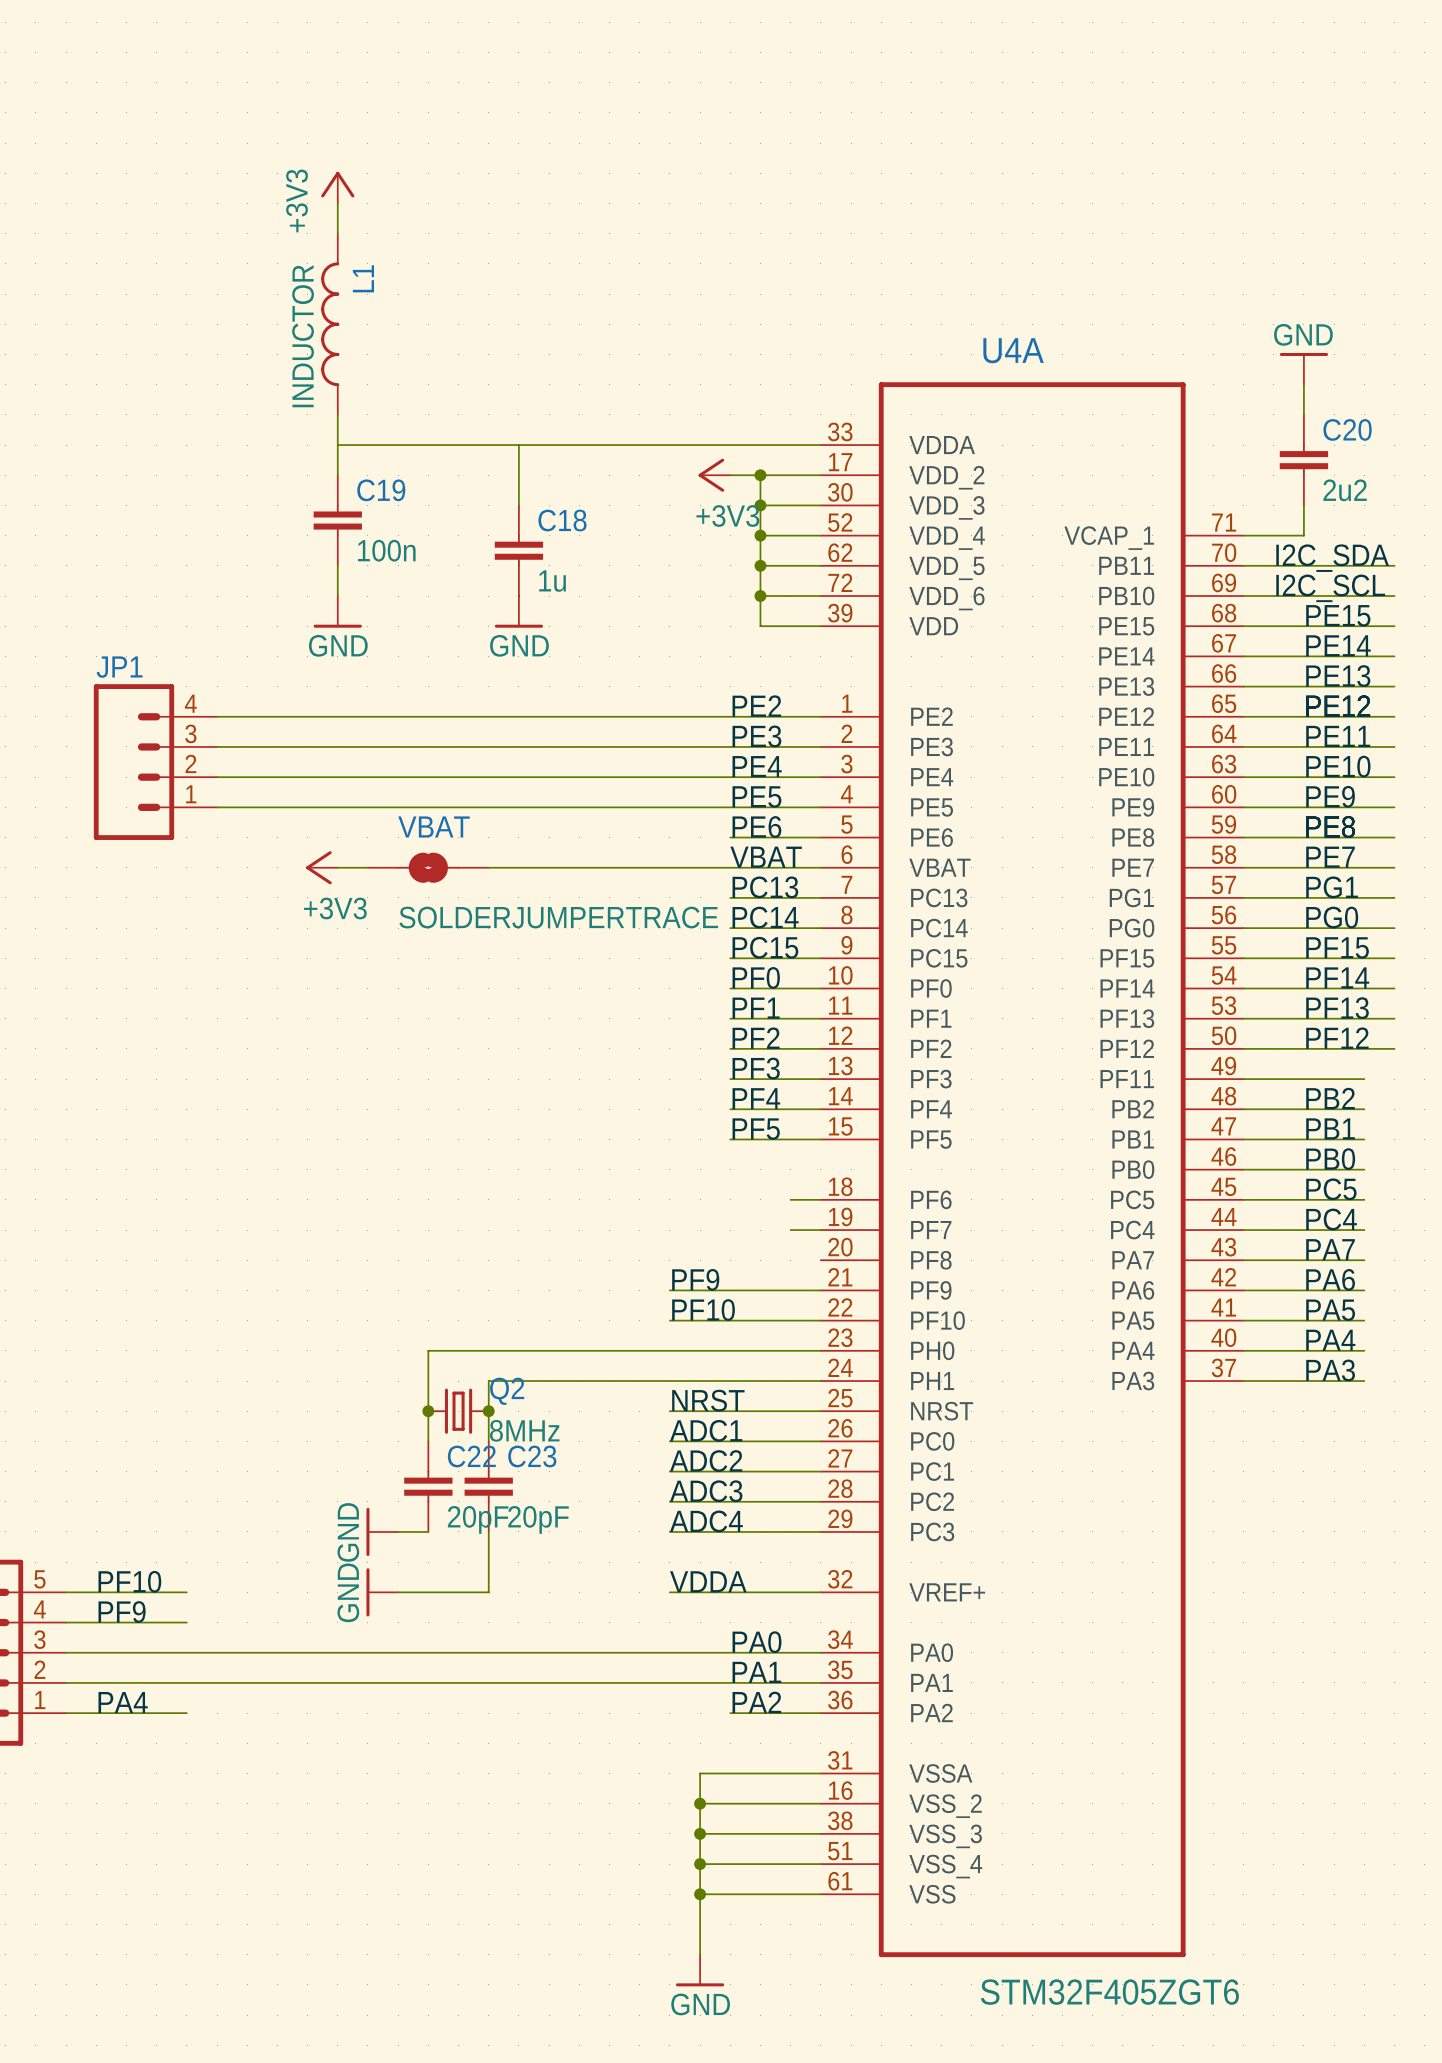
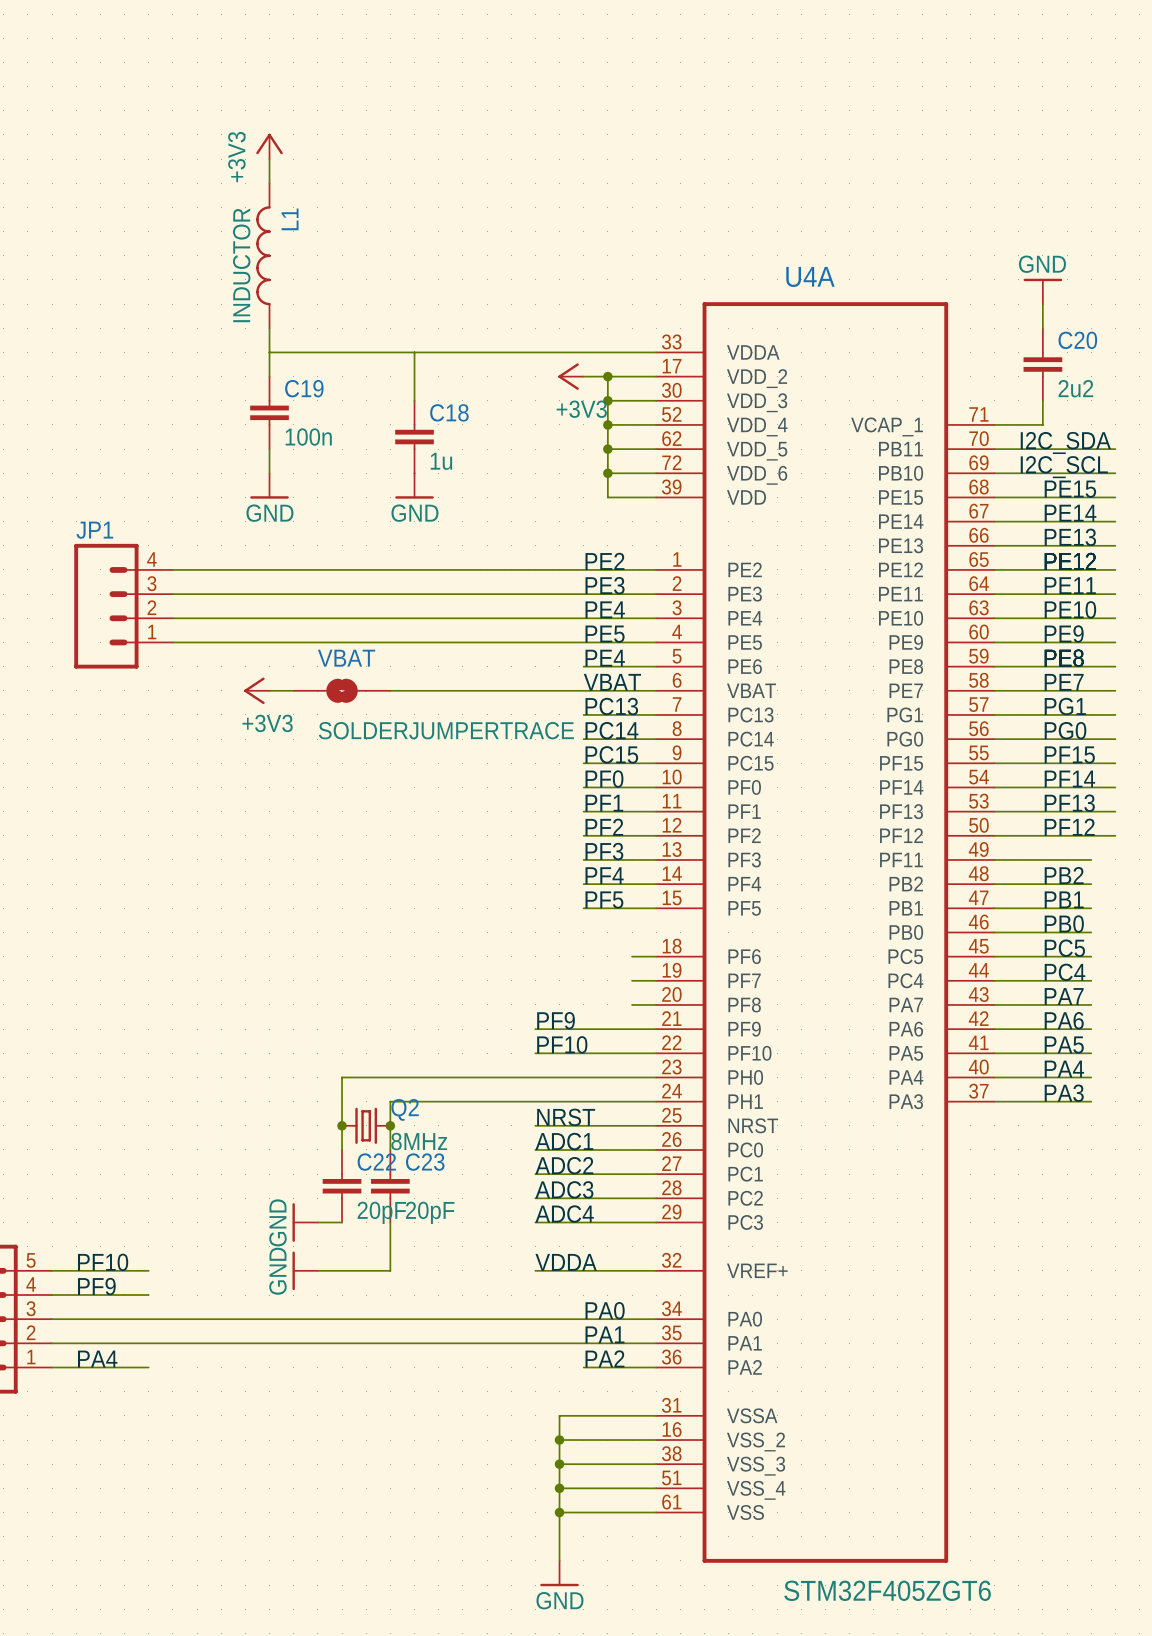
label: PE6 (756, 826) -> PE4 (605, 658)
wire: none -> (632, 1004) (656, 1004)

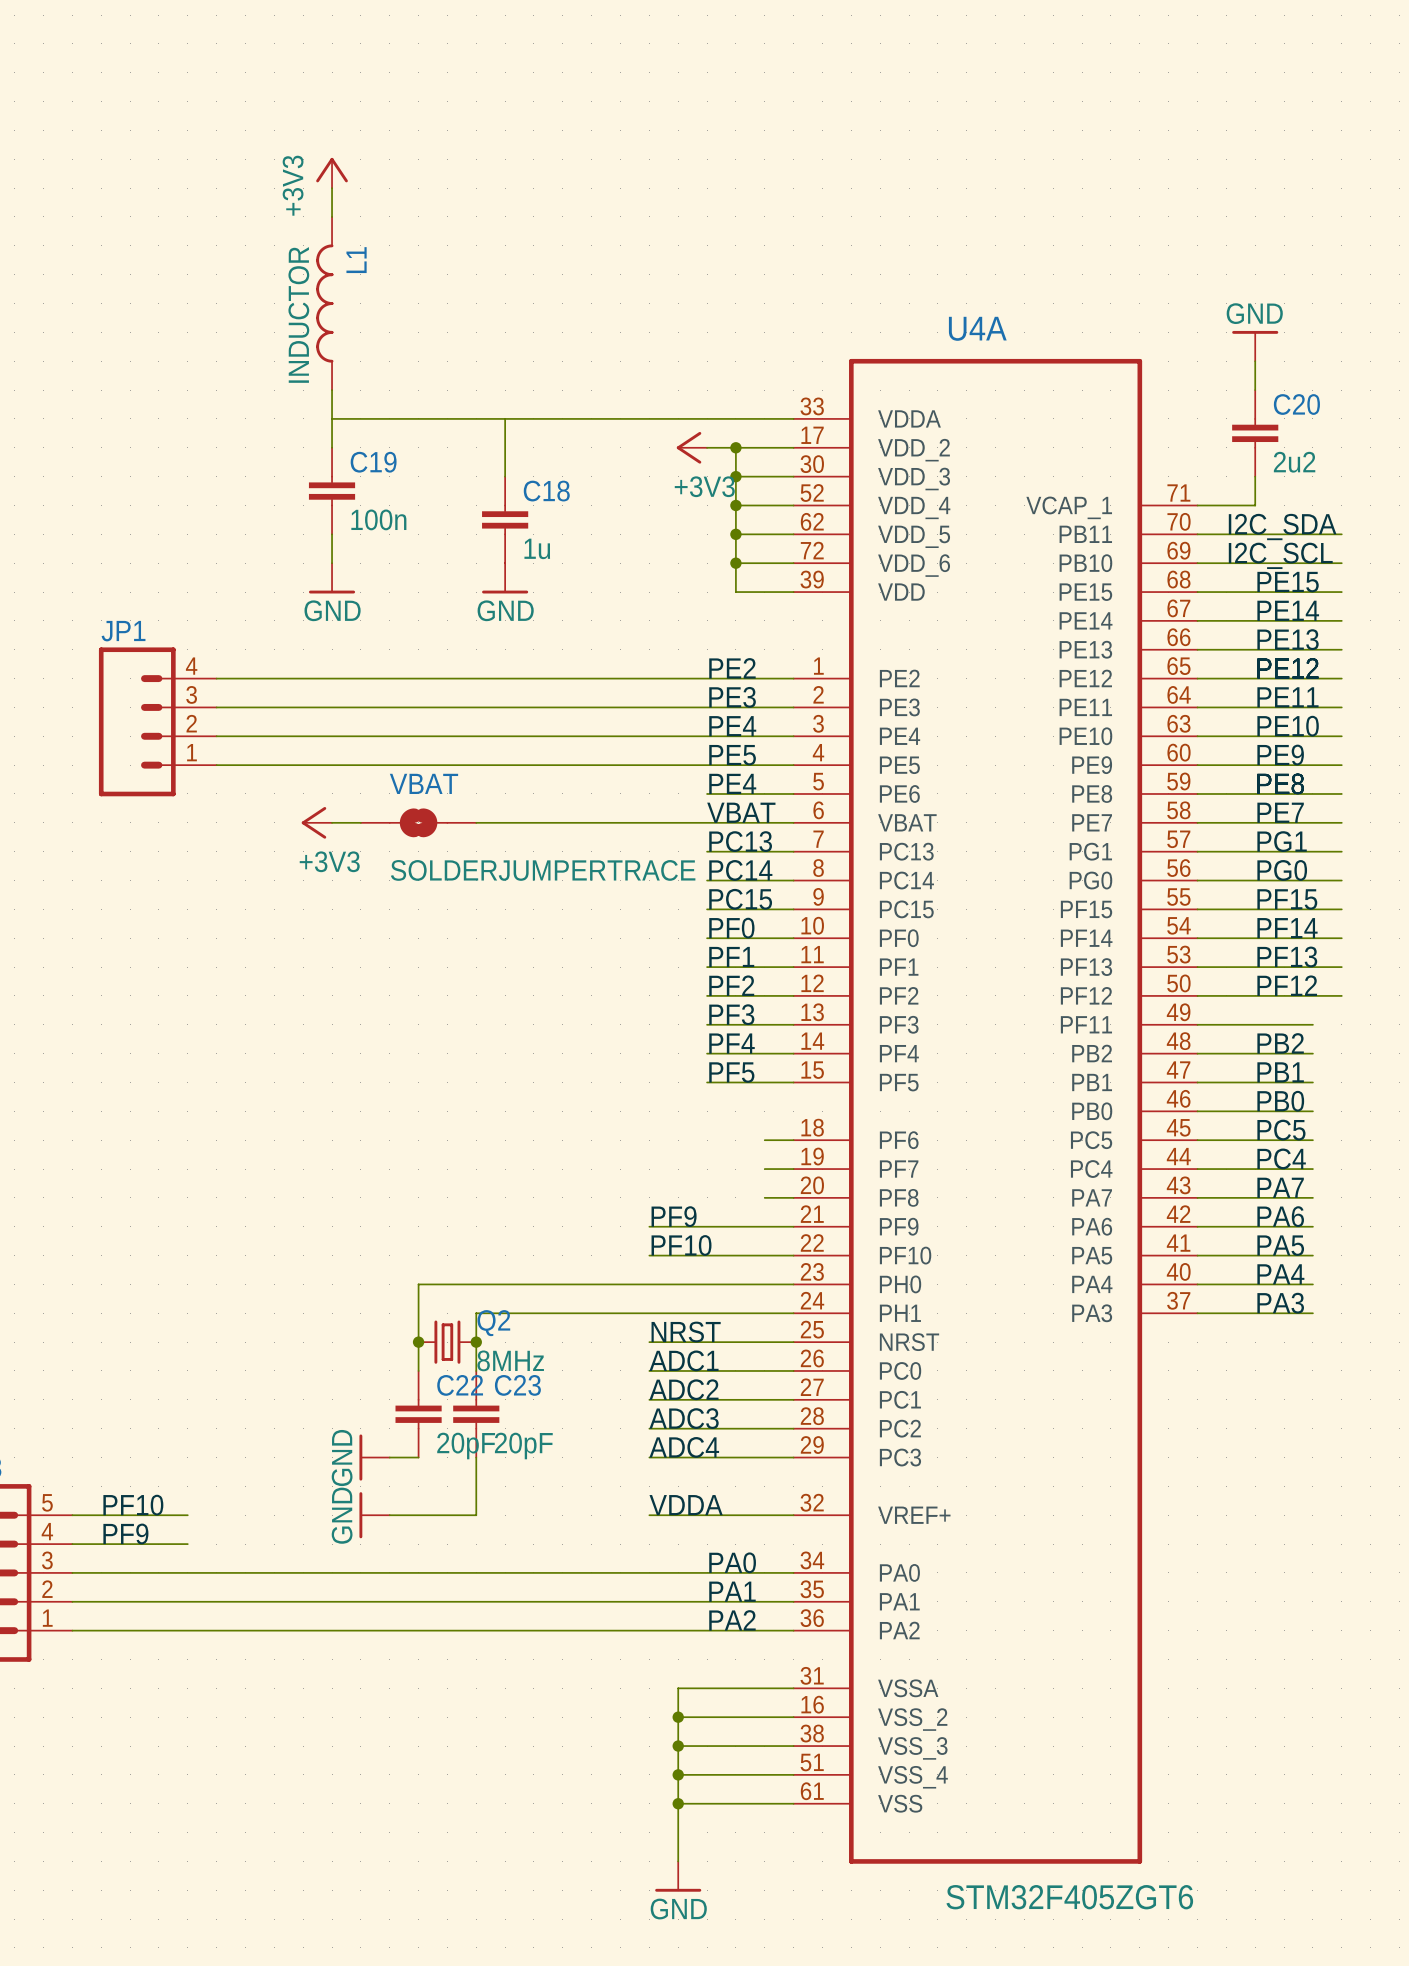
label: PA4 (97, 1359) -> none
wire: none -> (187, 1630) (707, 1630)

